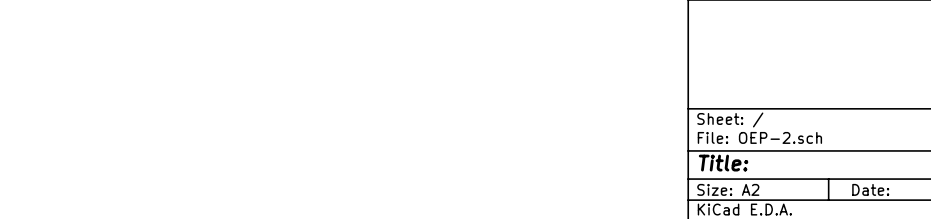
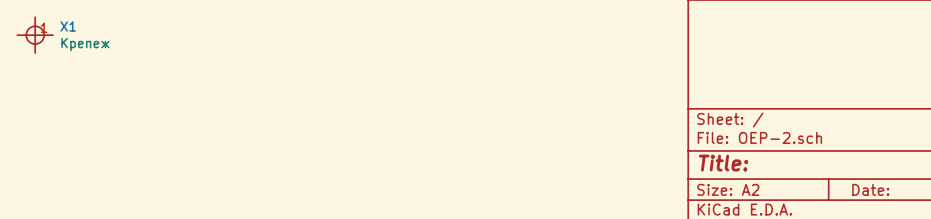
X1: none -> Крепеж (35, 35)

